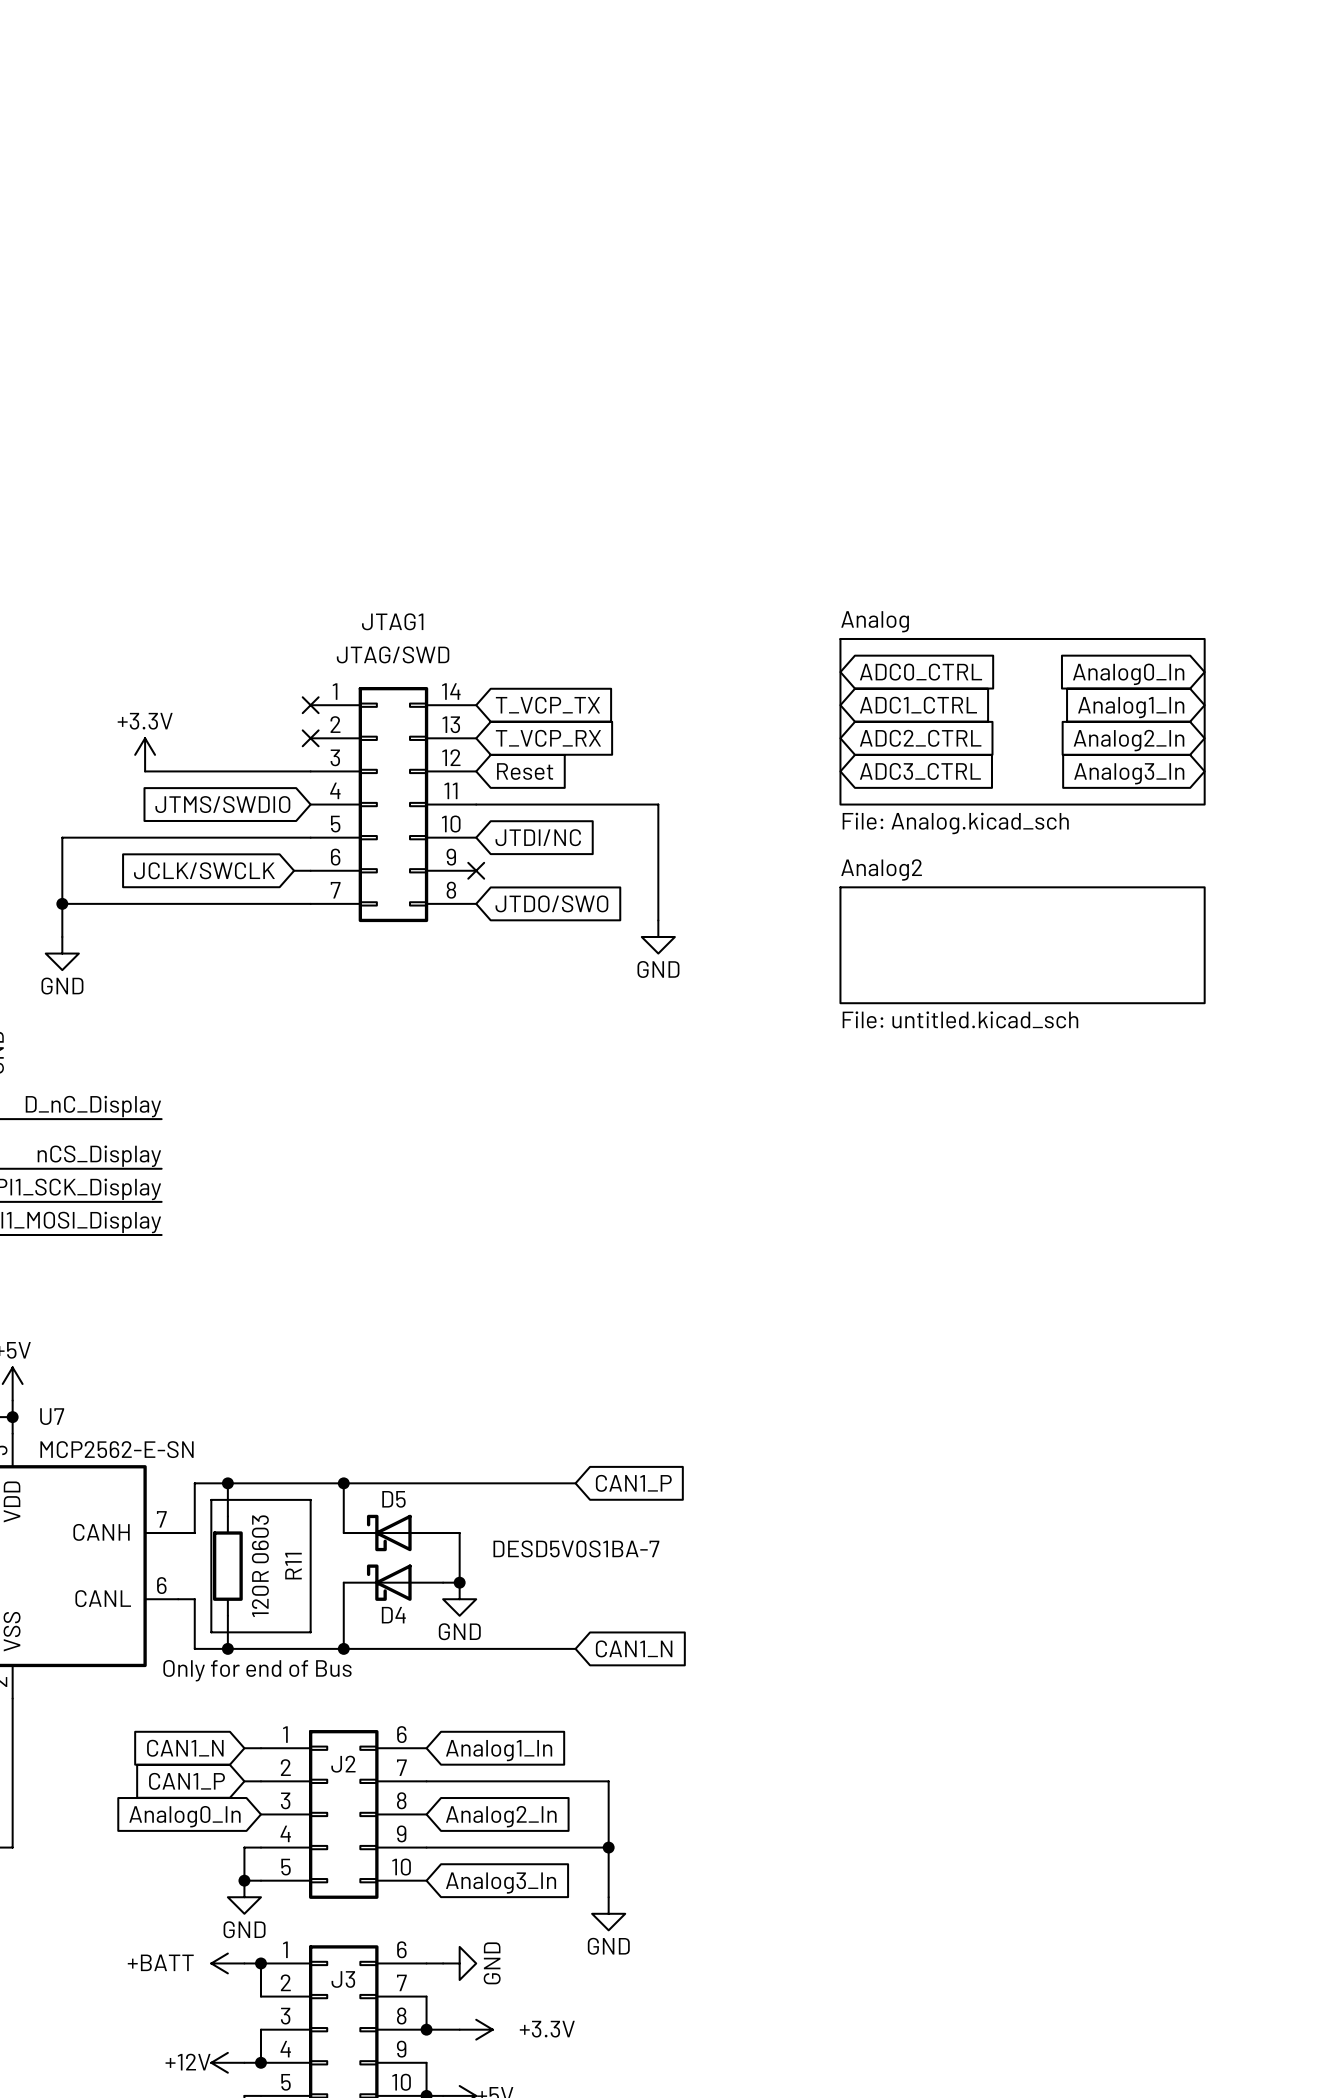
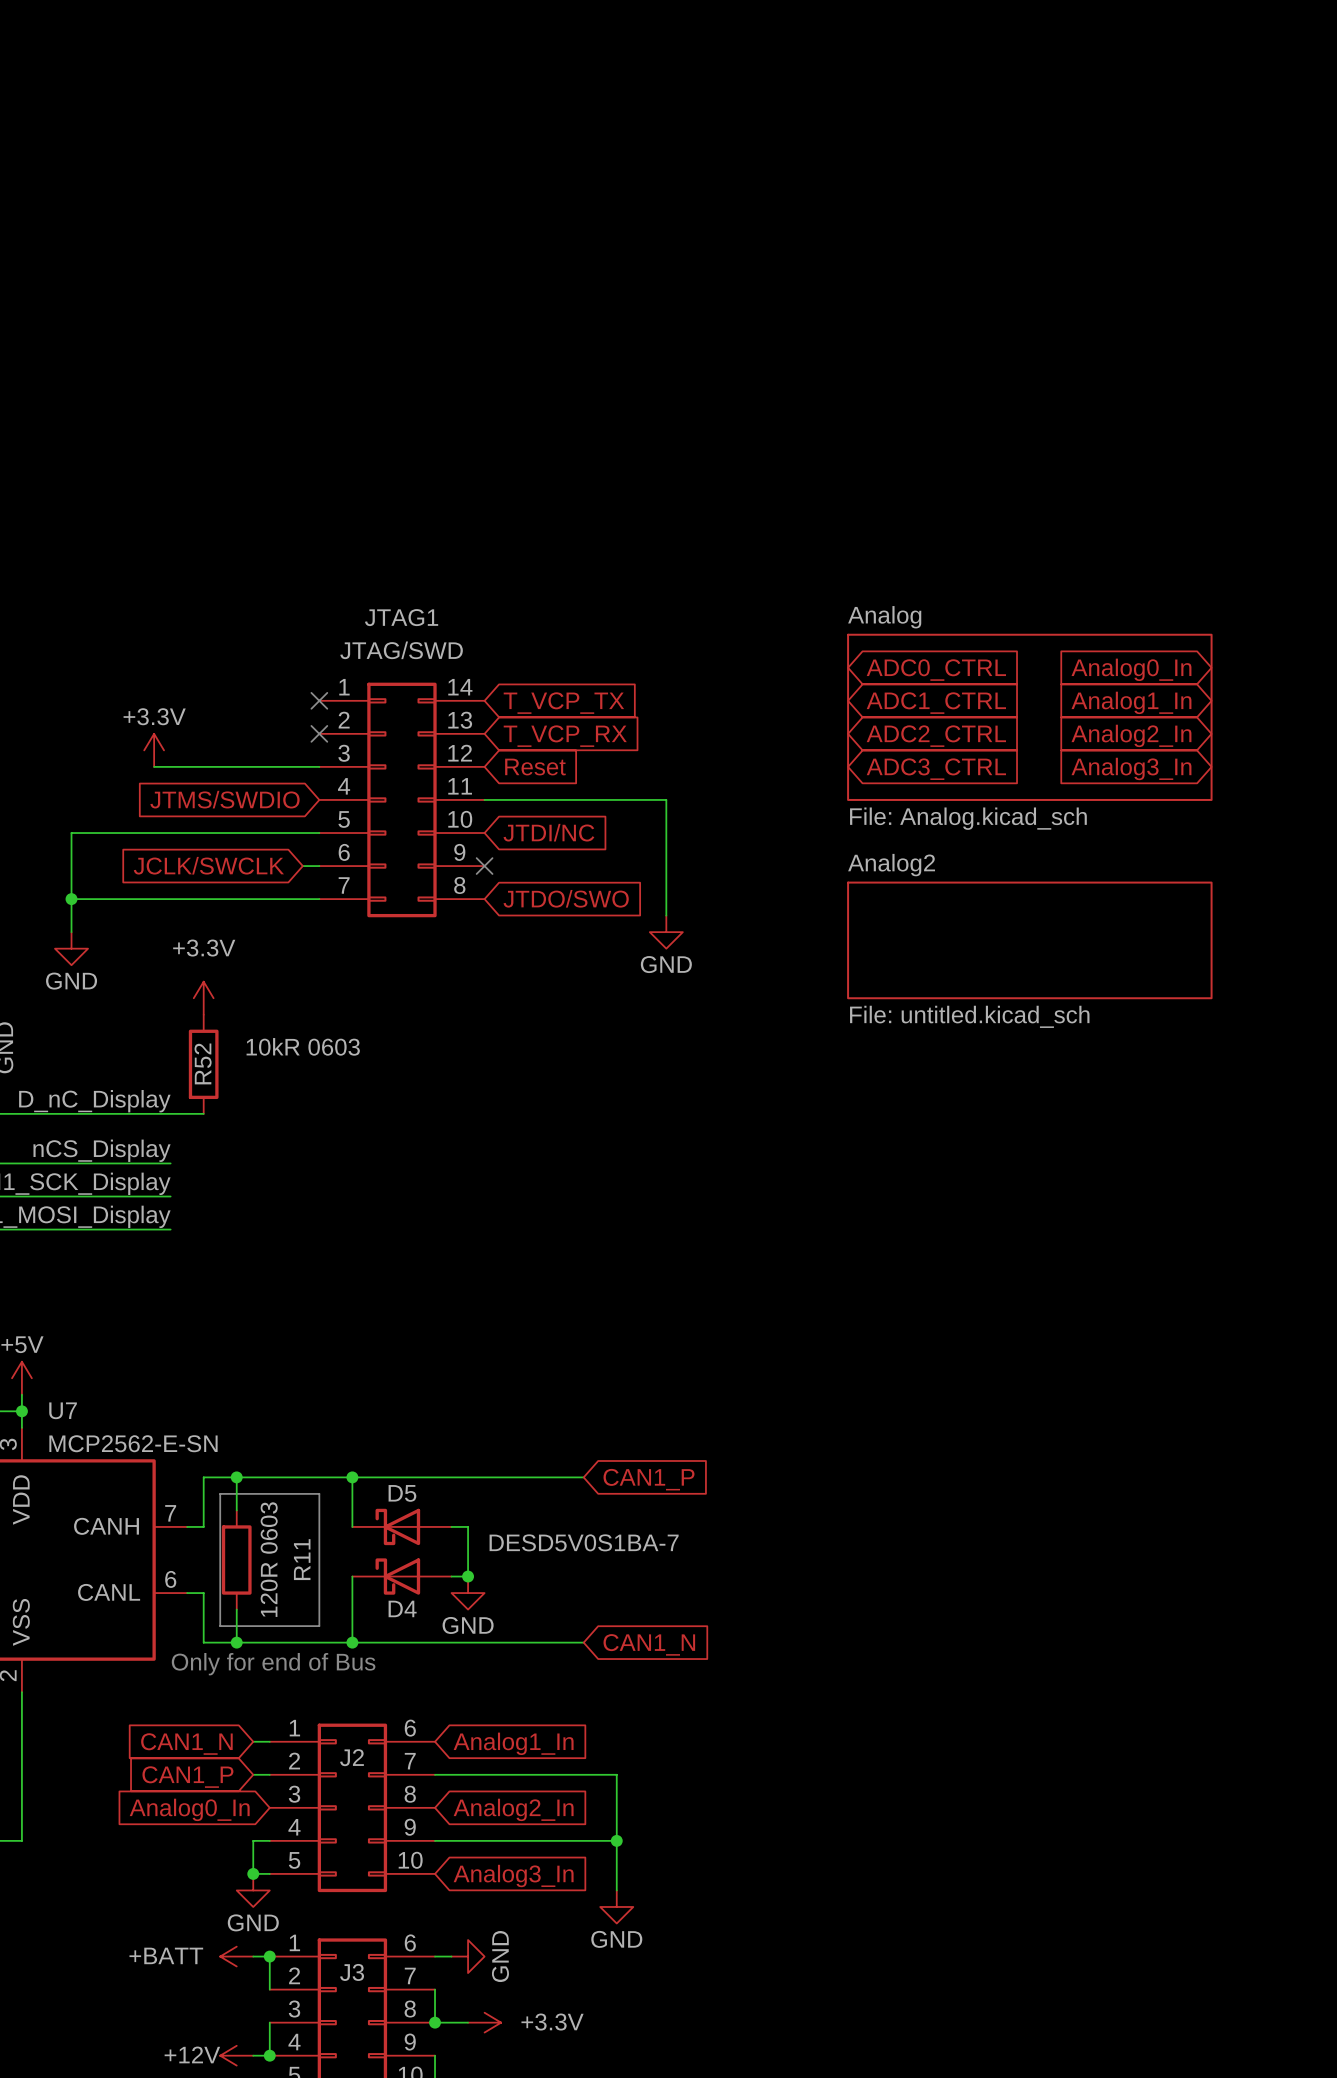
power symbol: none -> +3.3V (203, 998)
R52: none -> 10kR 0603 (203, 1064)
wire: none -> (170, 1113) (203, 1113)

